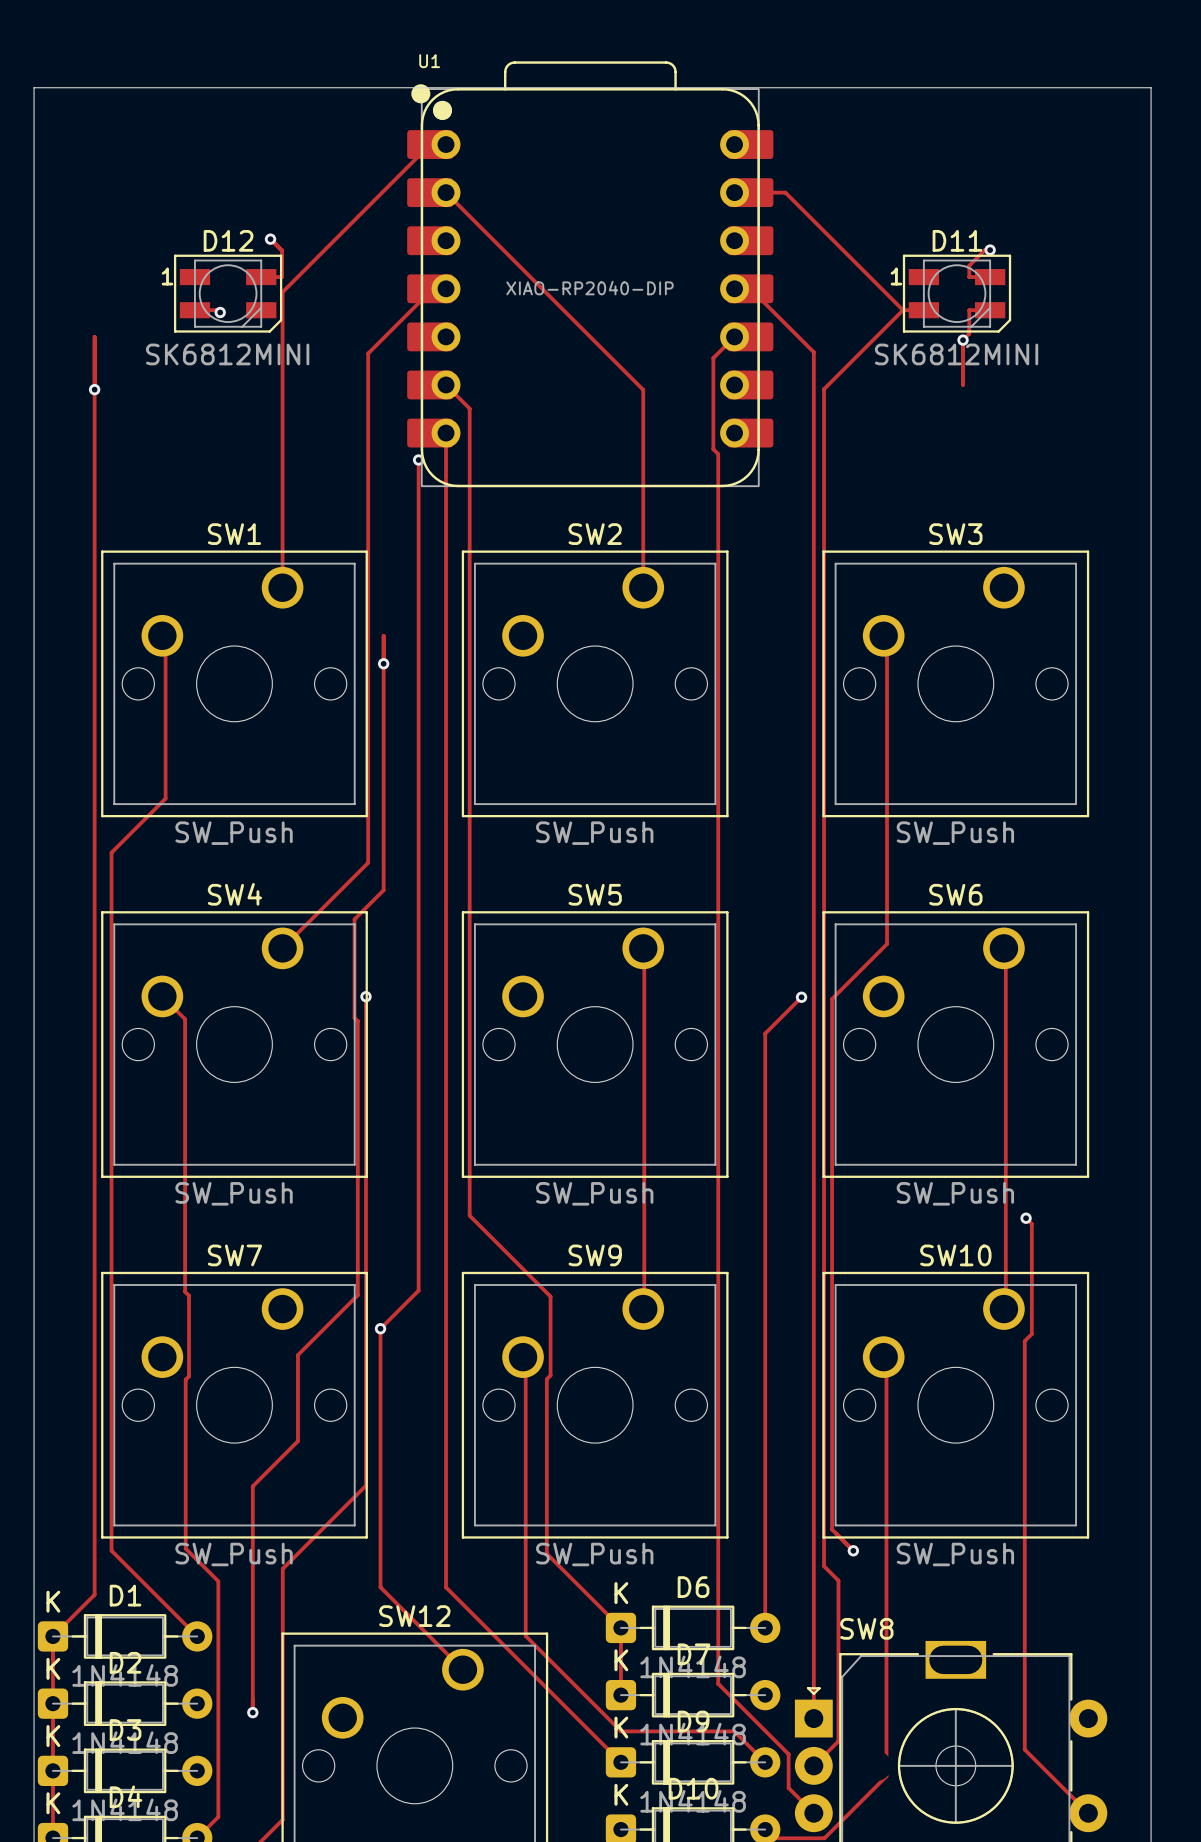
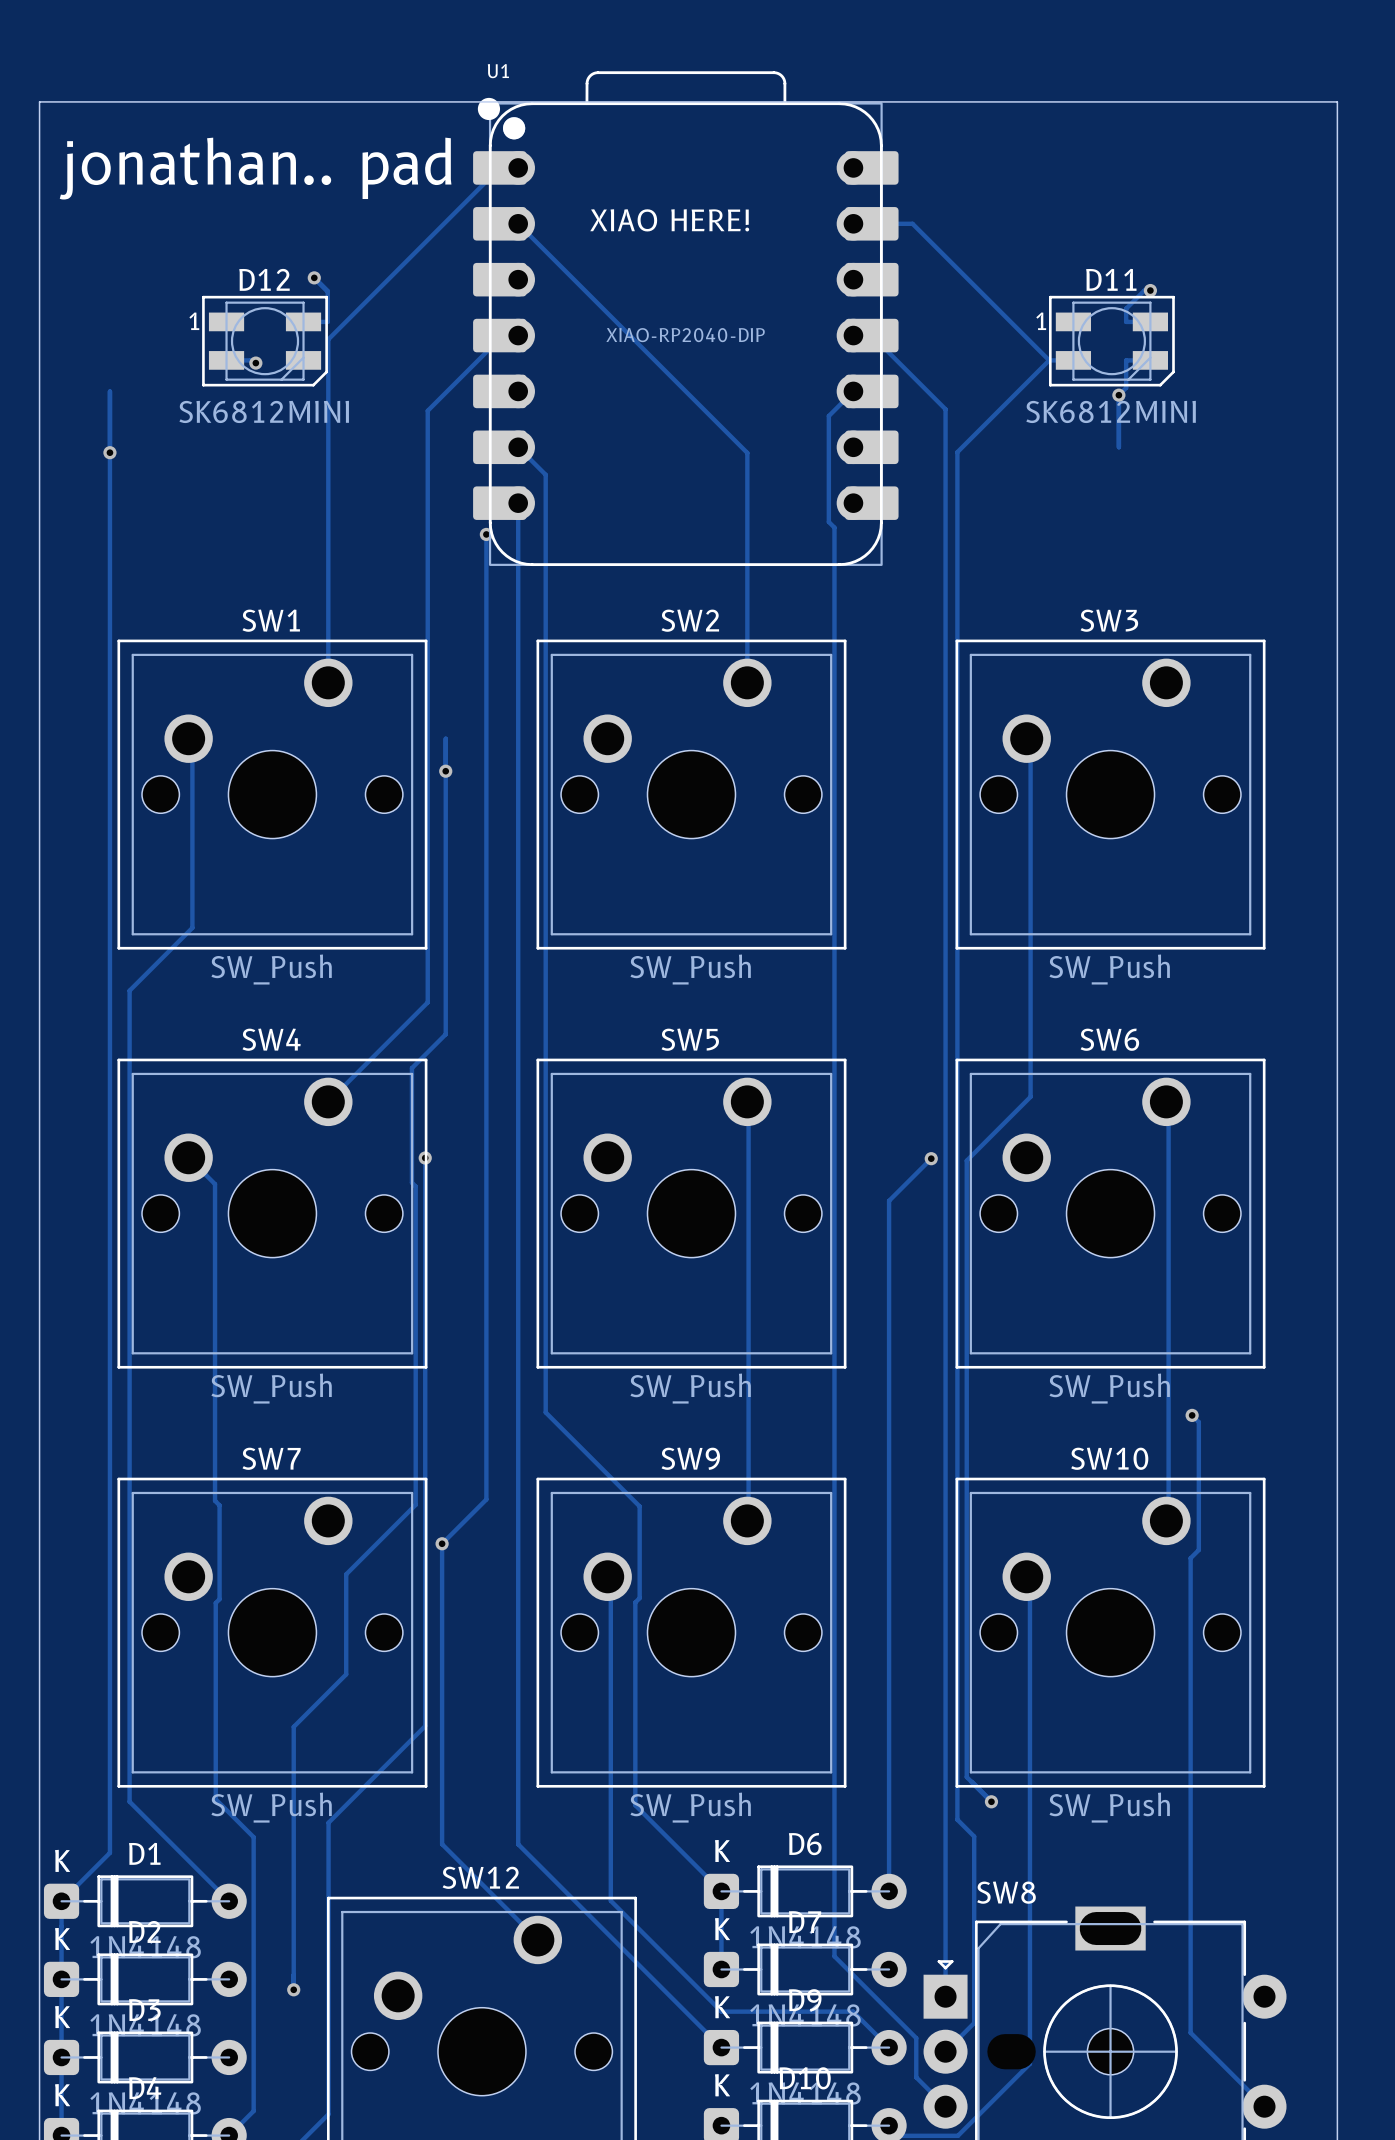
text: none -> jonathan.. pad (255, 168)
text: none -> XIAO HERE! (669, 220)

